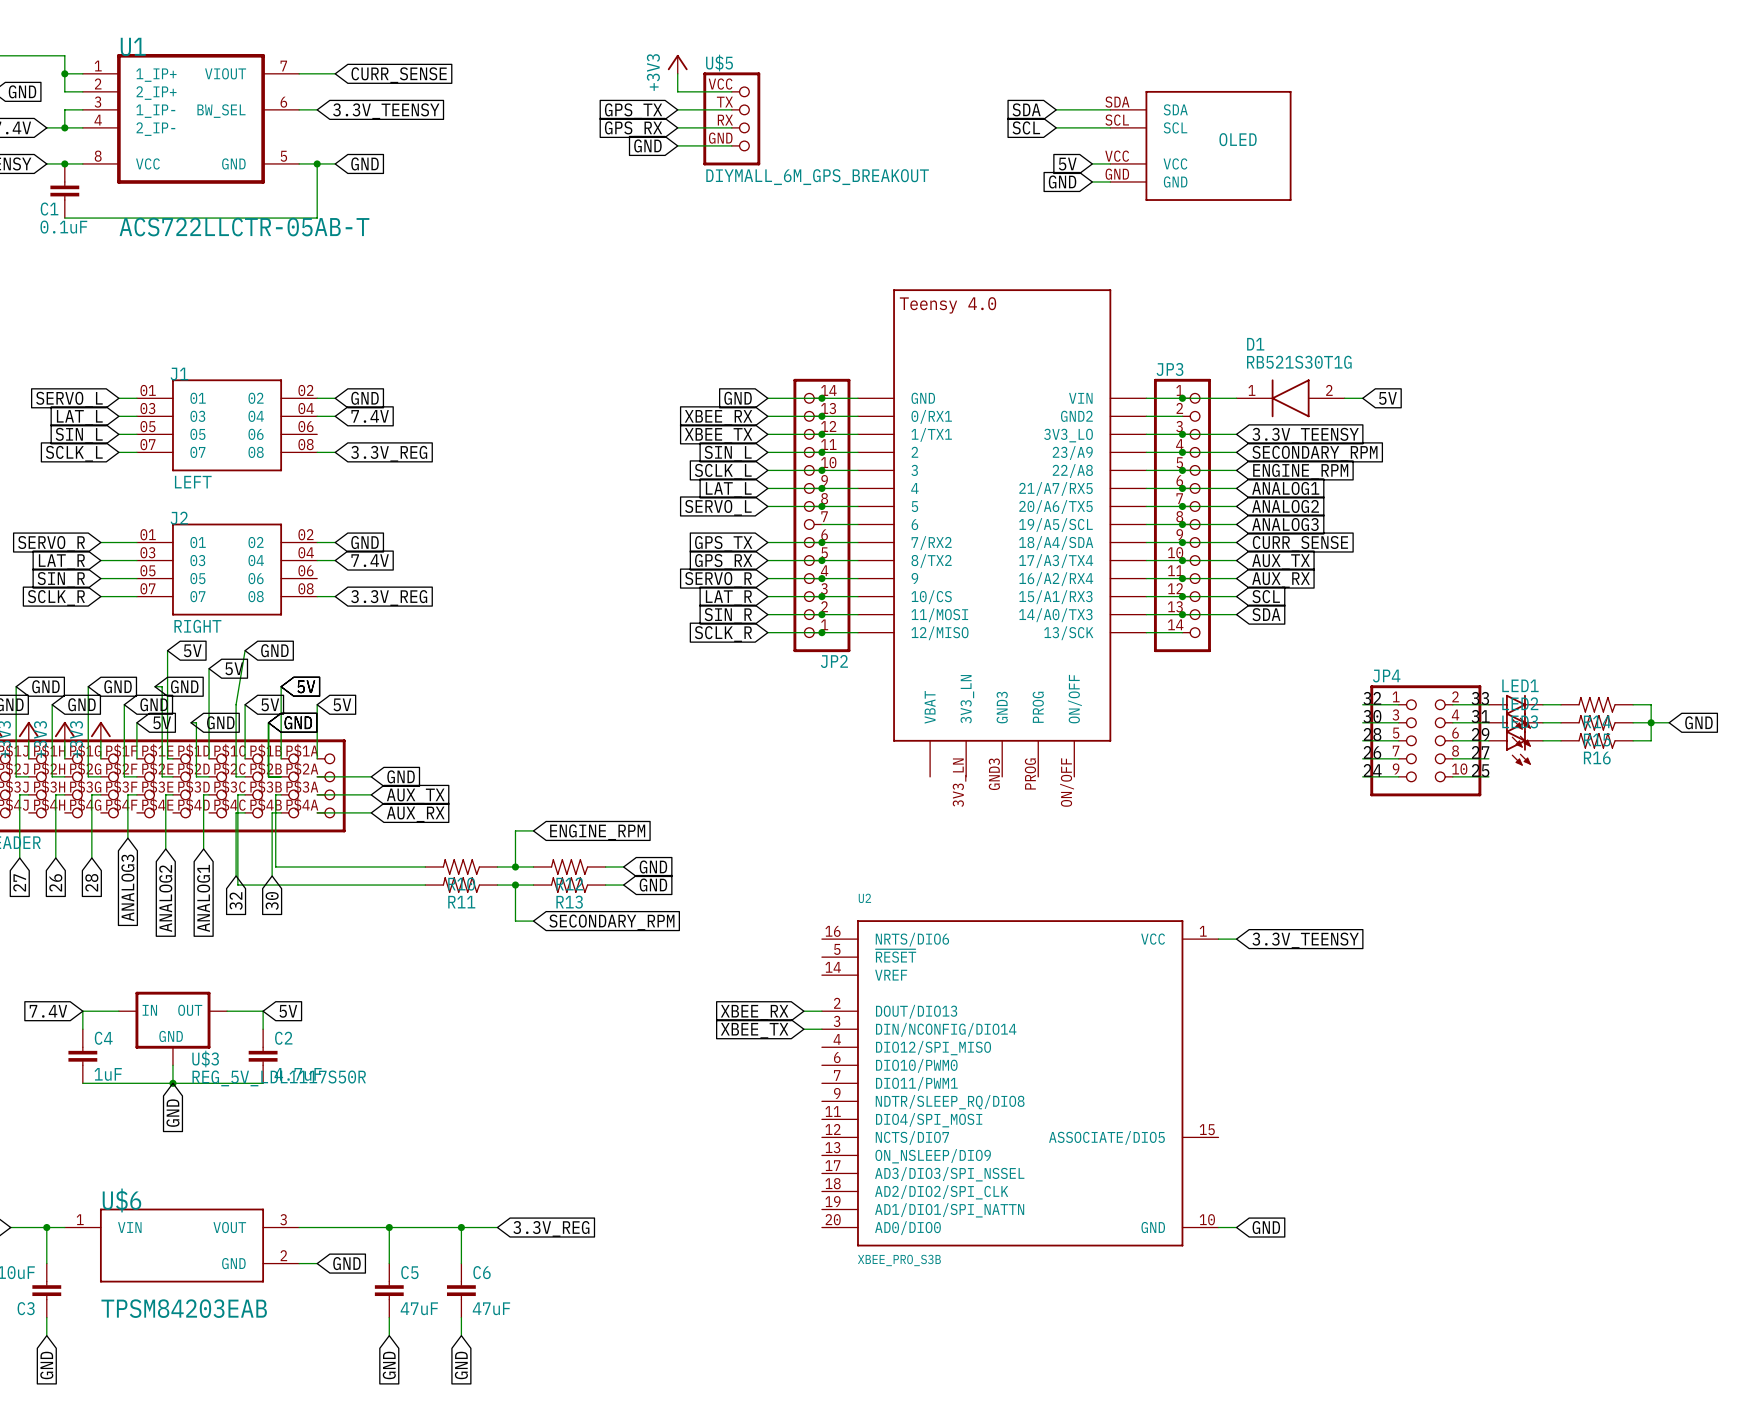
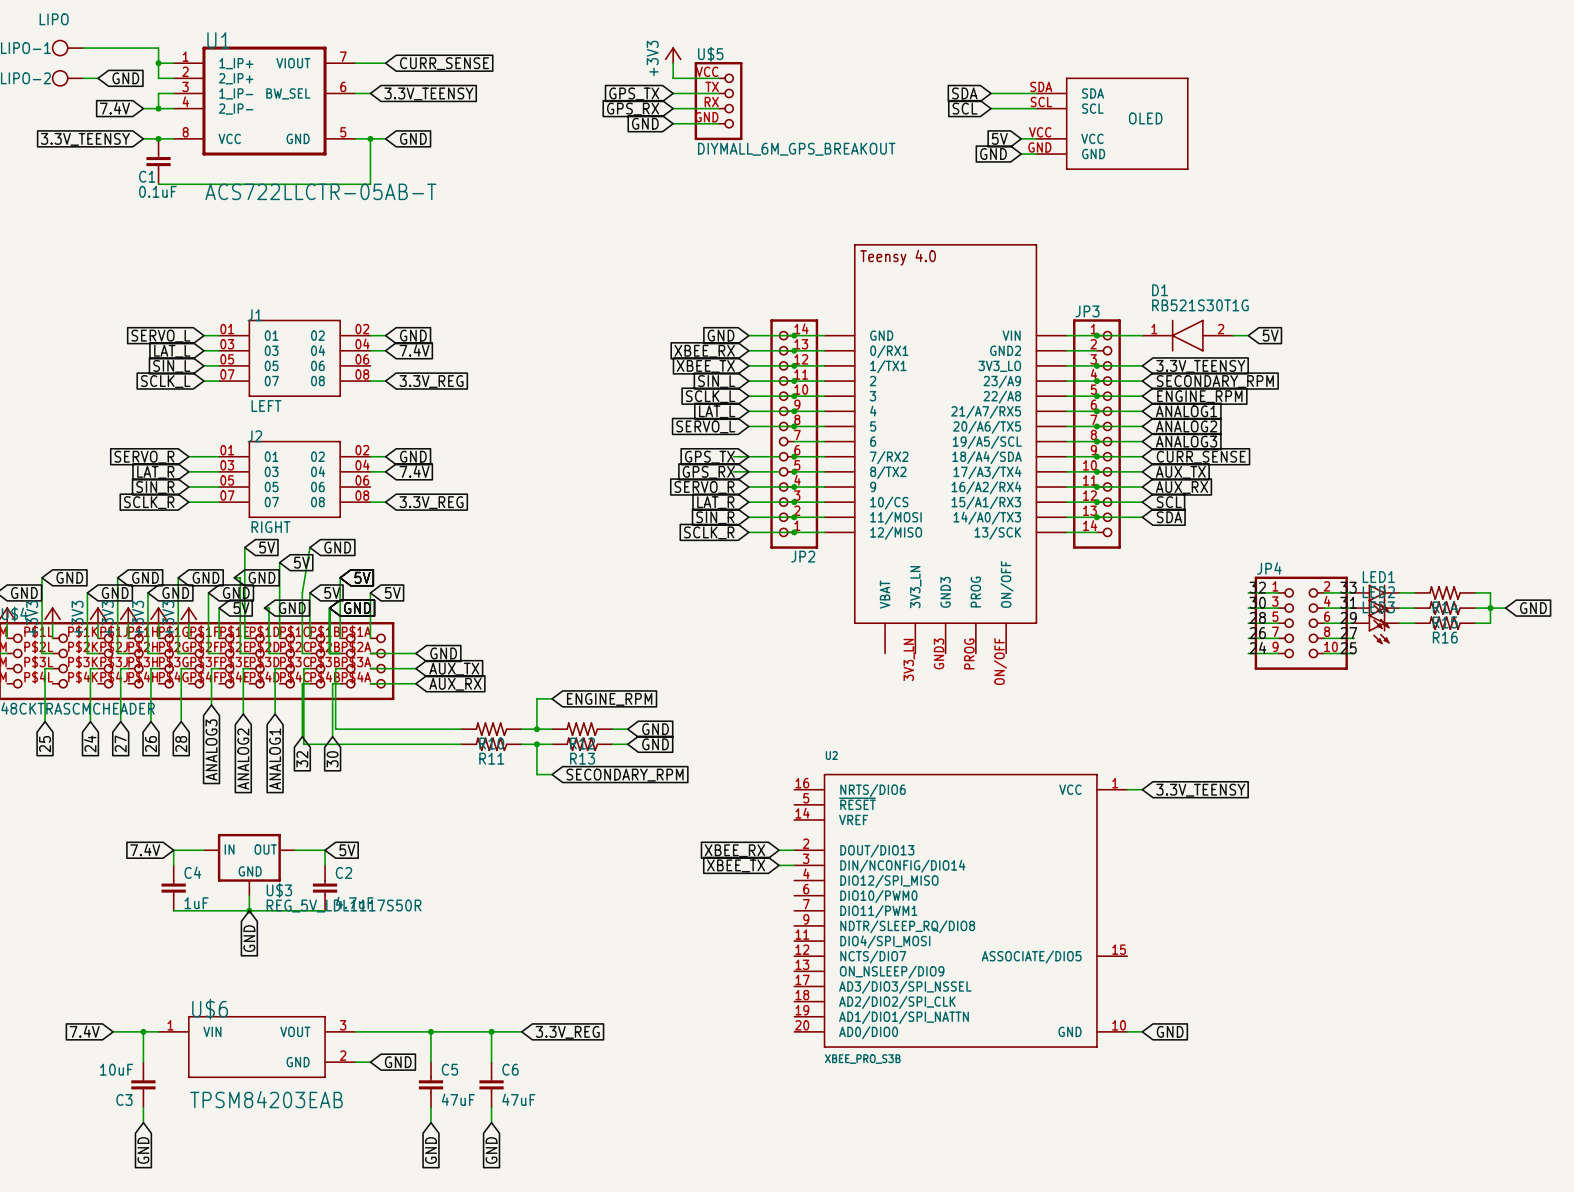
wire: (803, 542) (821, 542) -> (733, 456) (748, 456)
wire: (803, 560) (821, 560) -> (733, 471) (748, 471)

